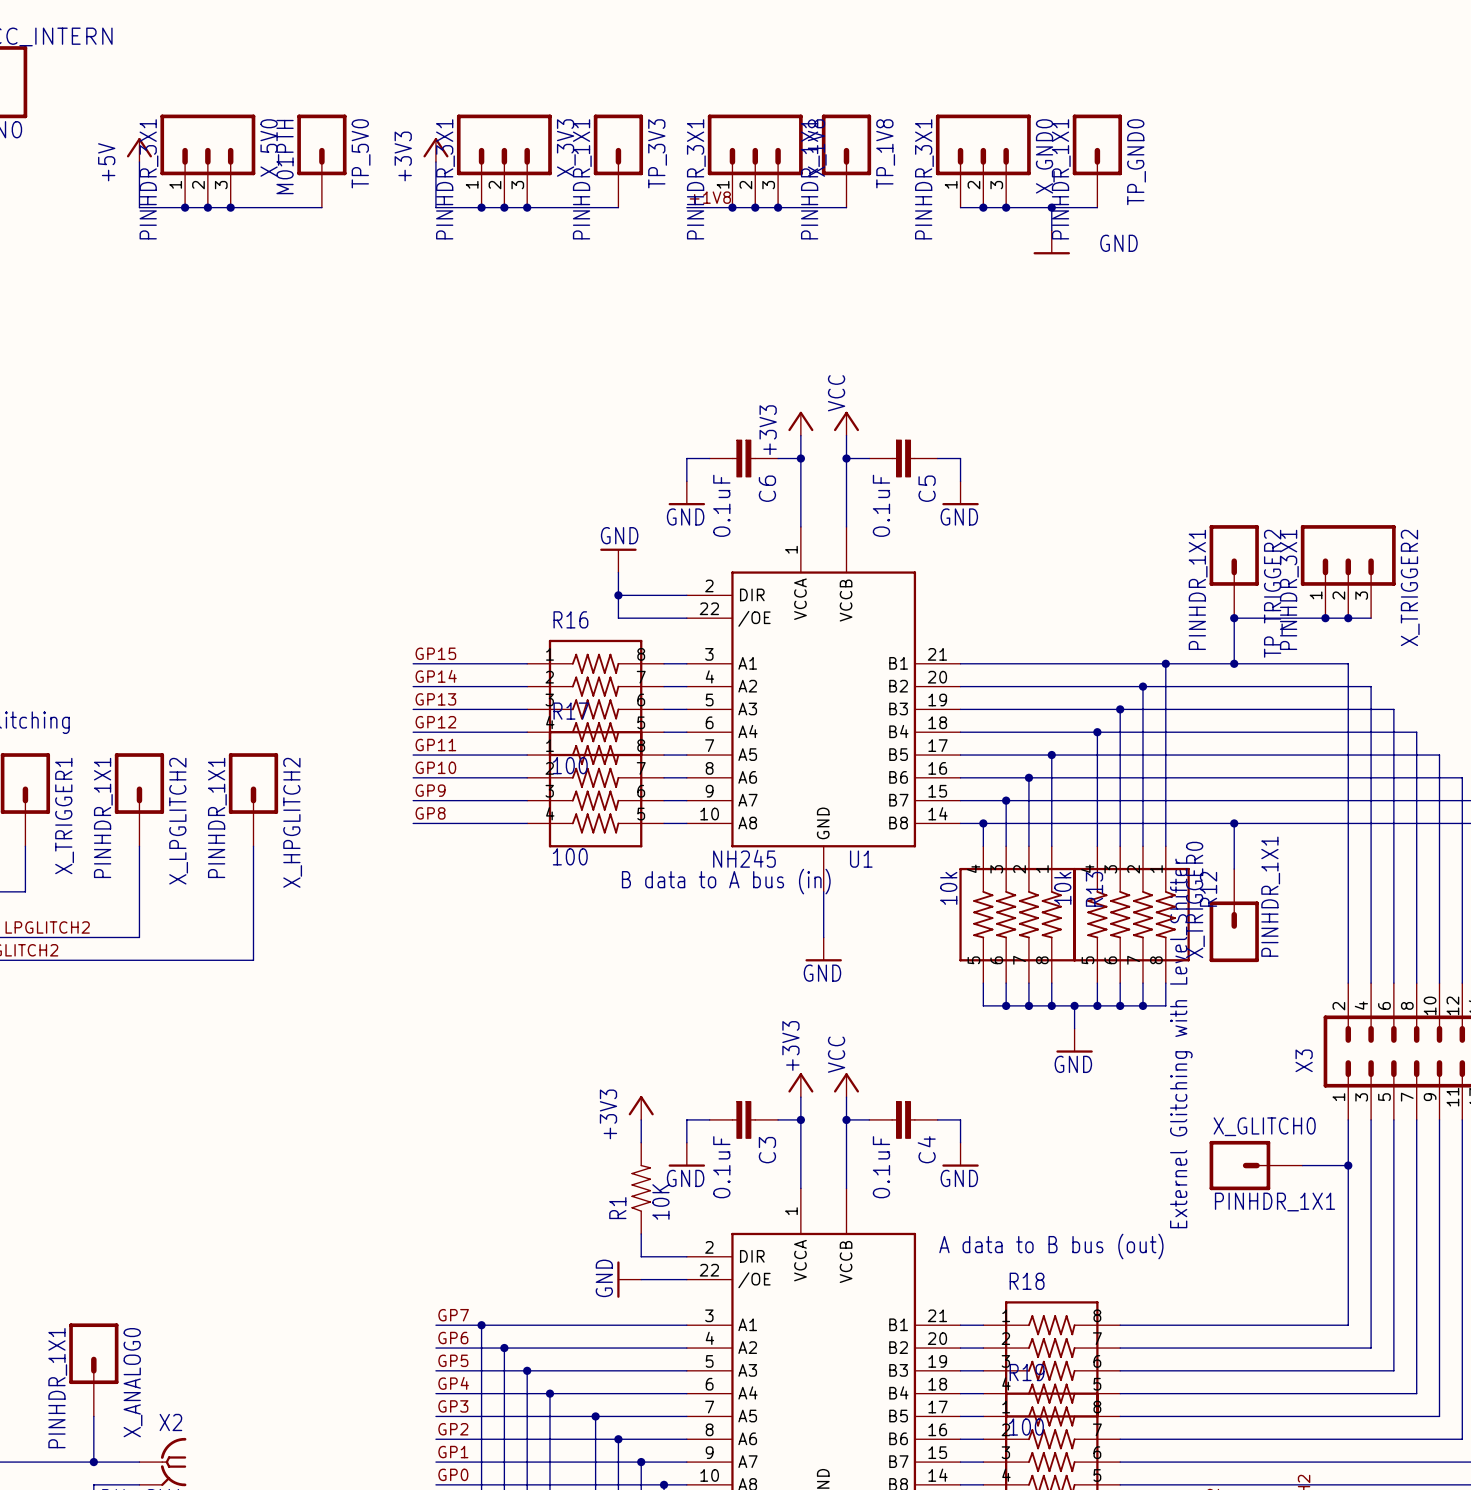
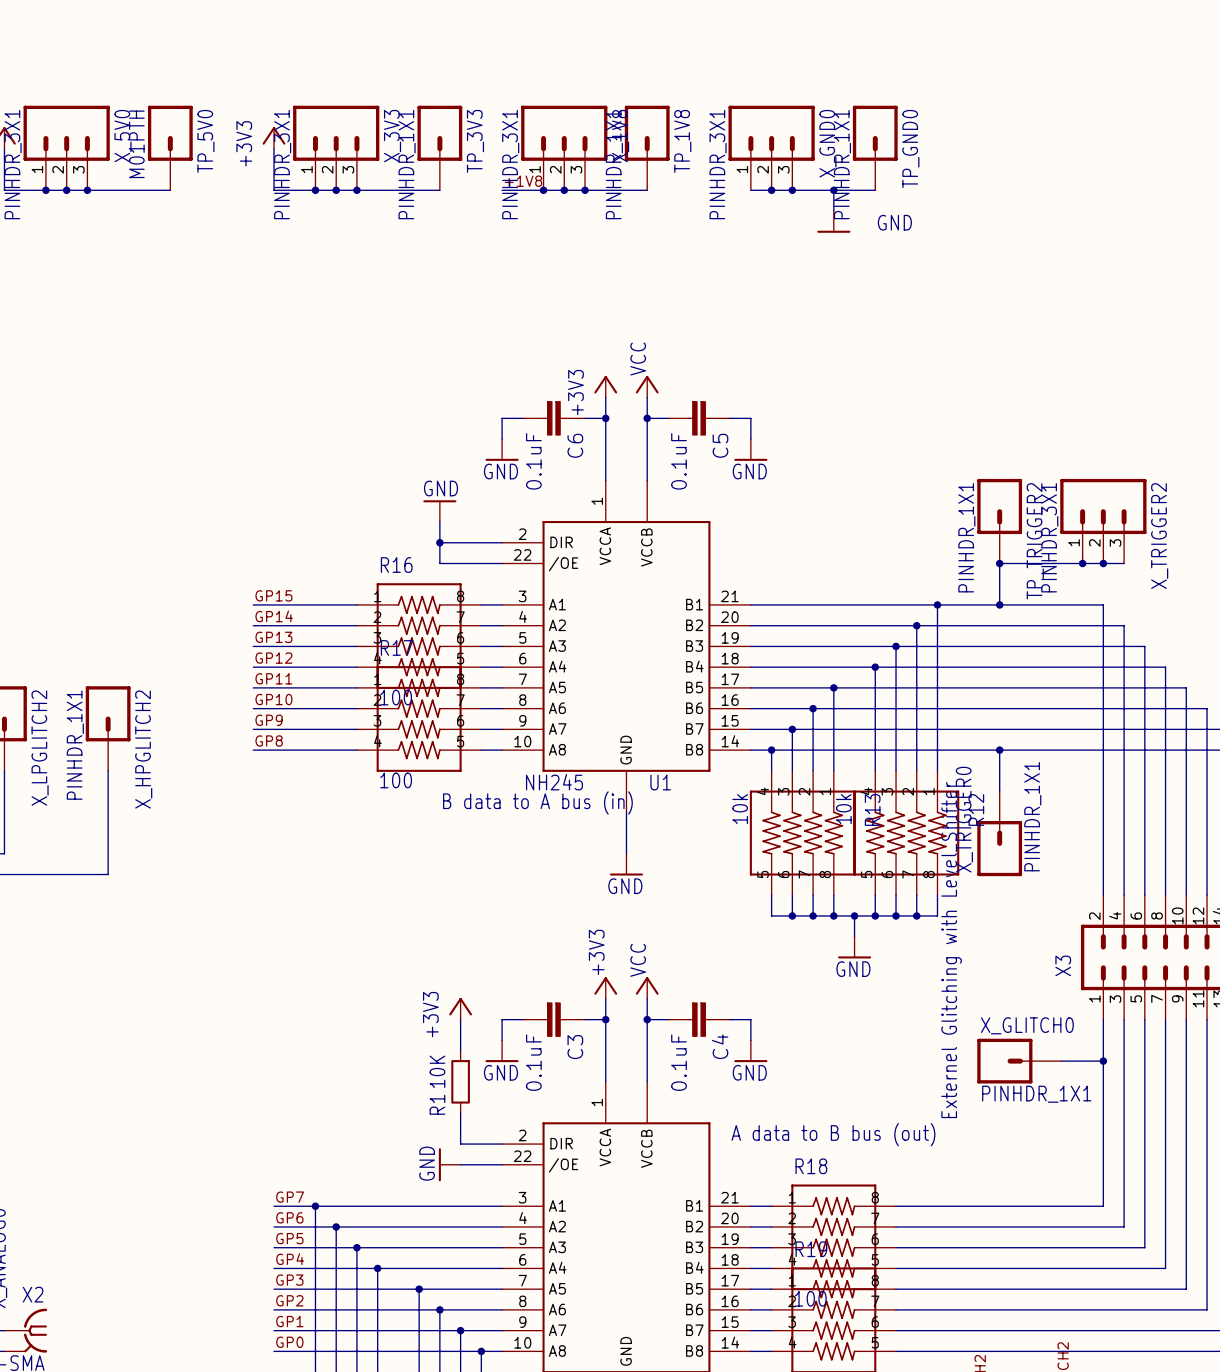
R1 symbol: [631, 1142, 652, 1234] -> [451, 1050, 470, 1113]
R1 value position: 10K (660, 1201) -> 10K (437, 1071)

